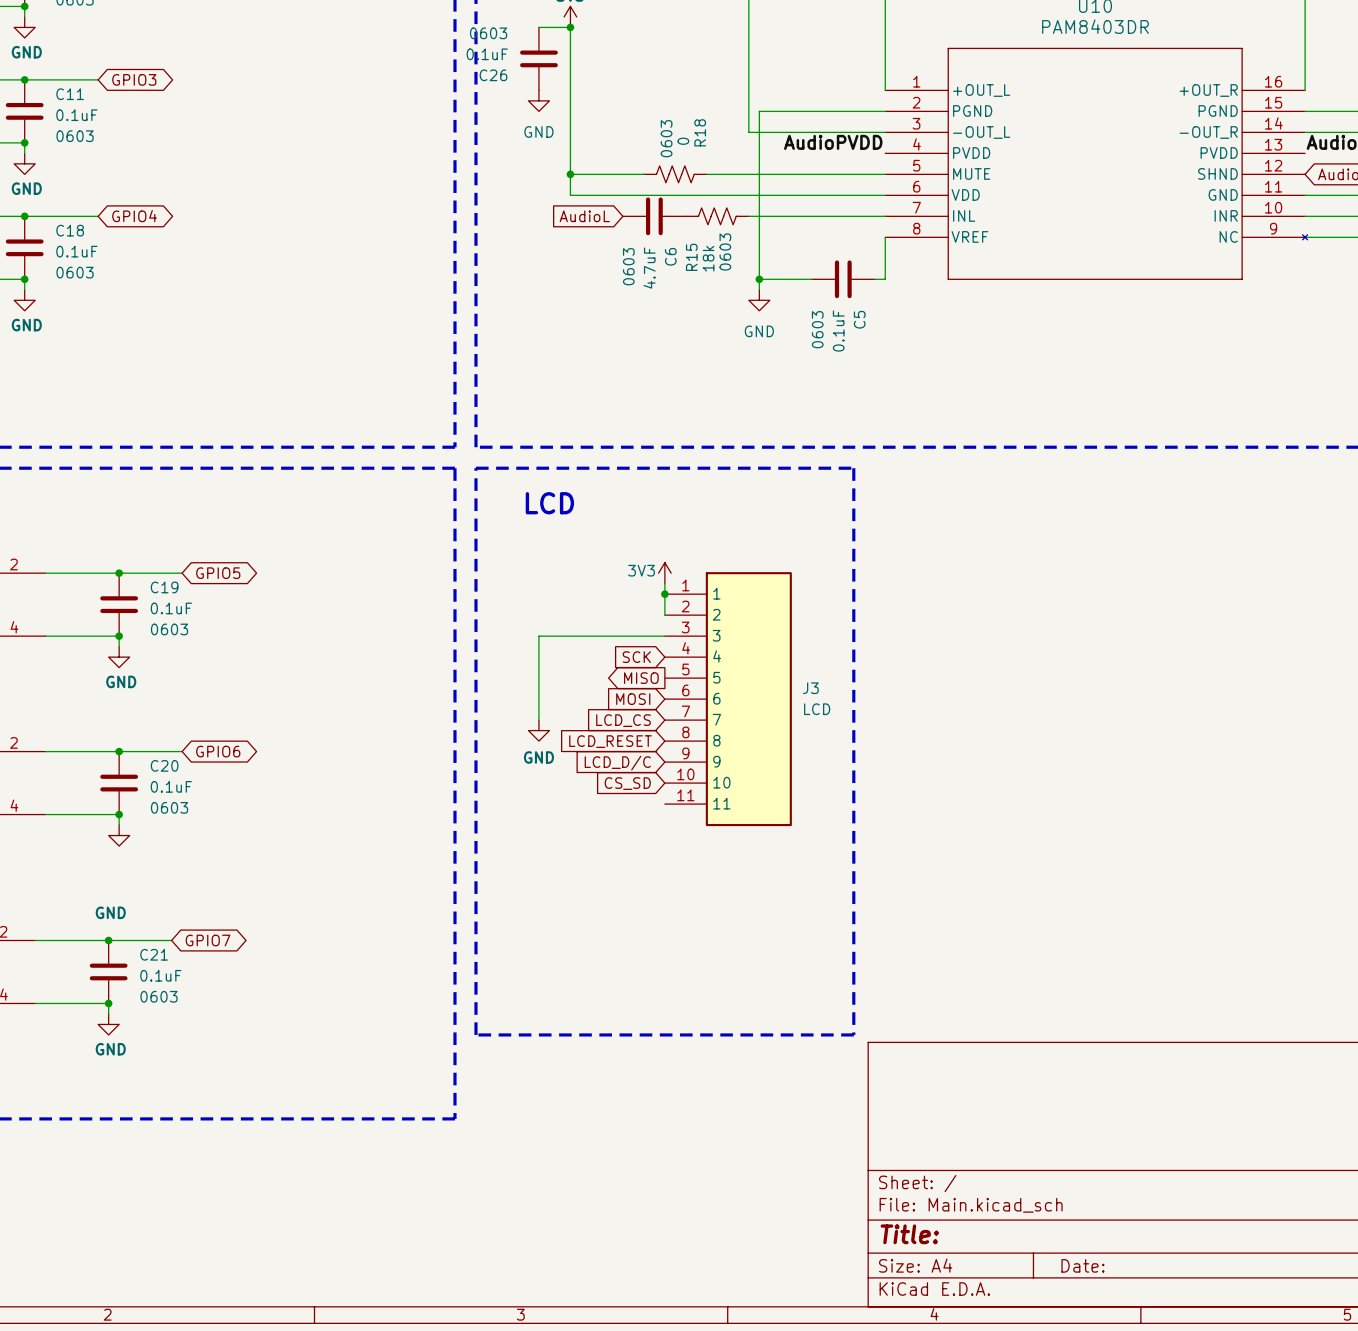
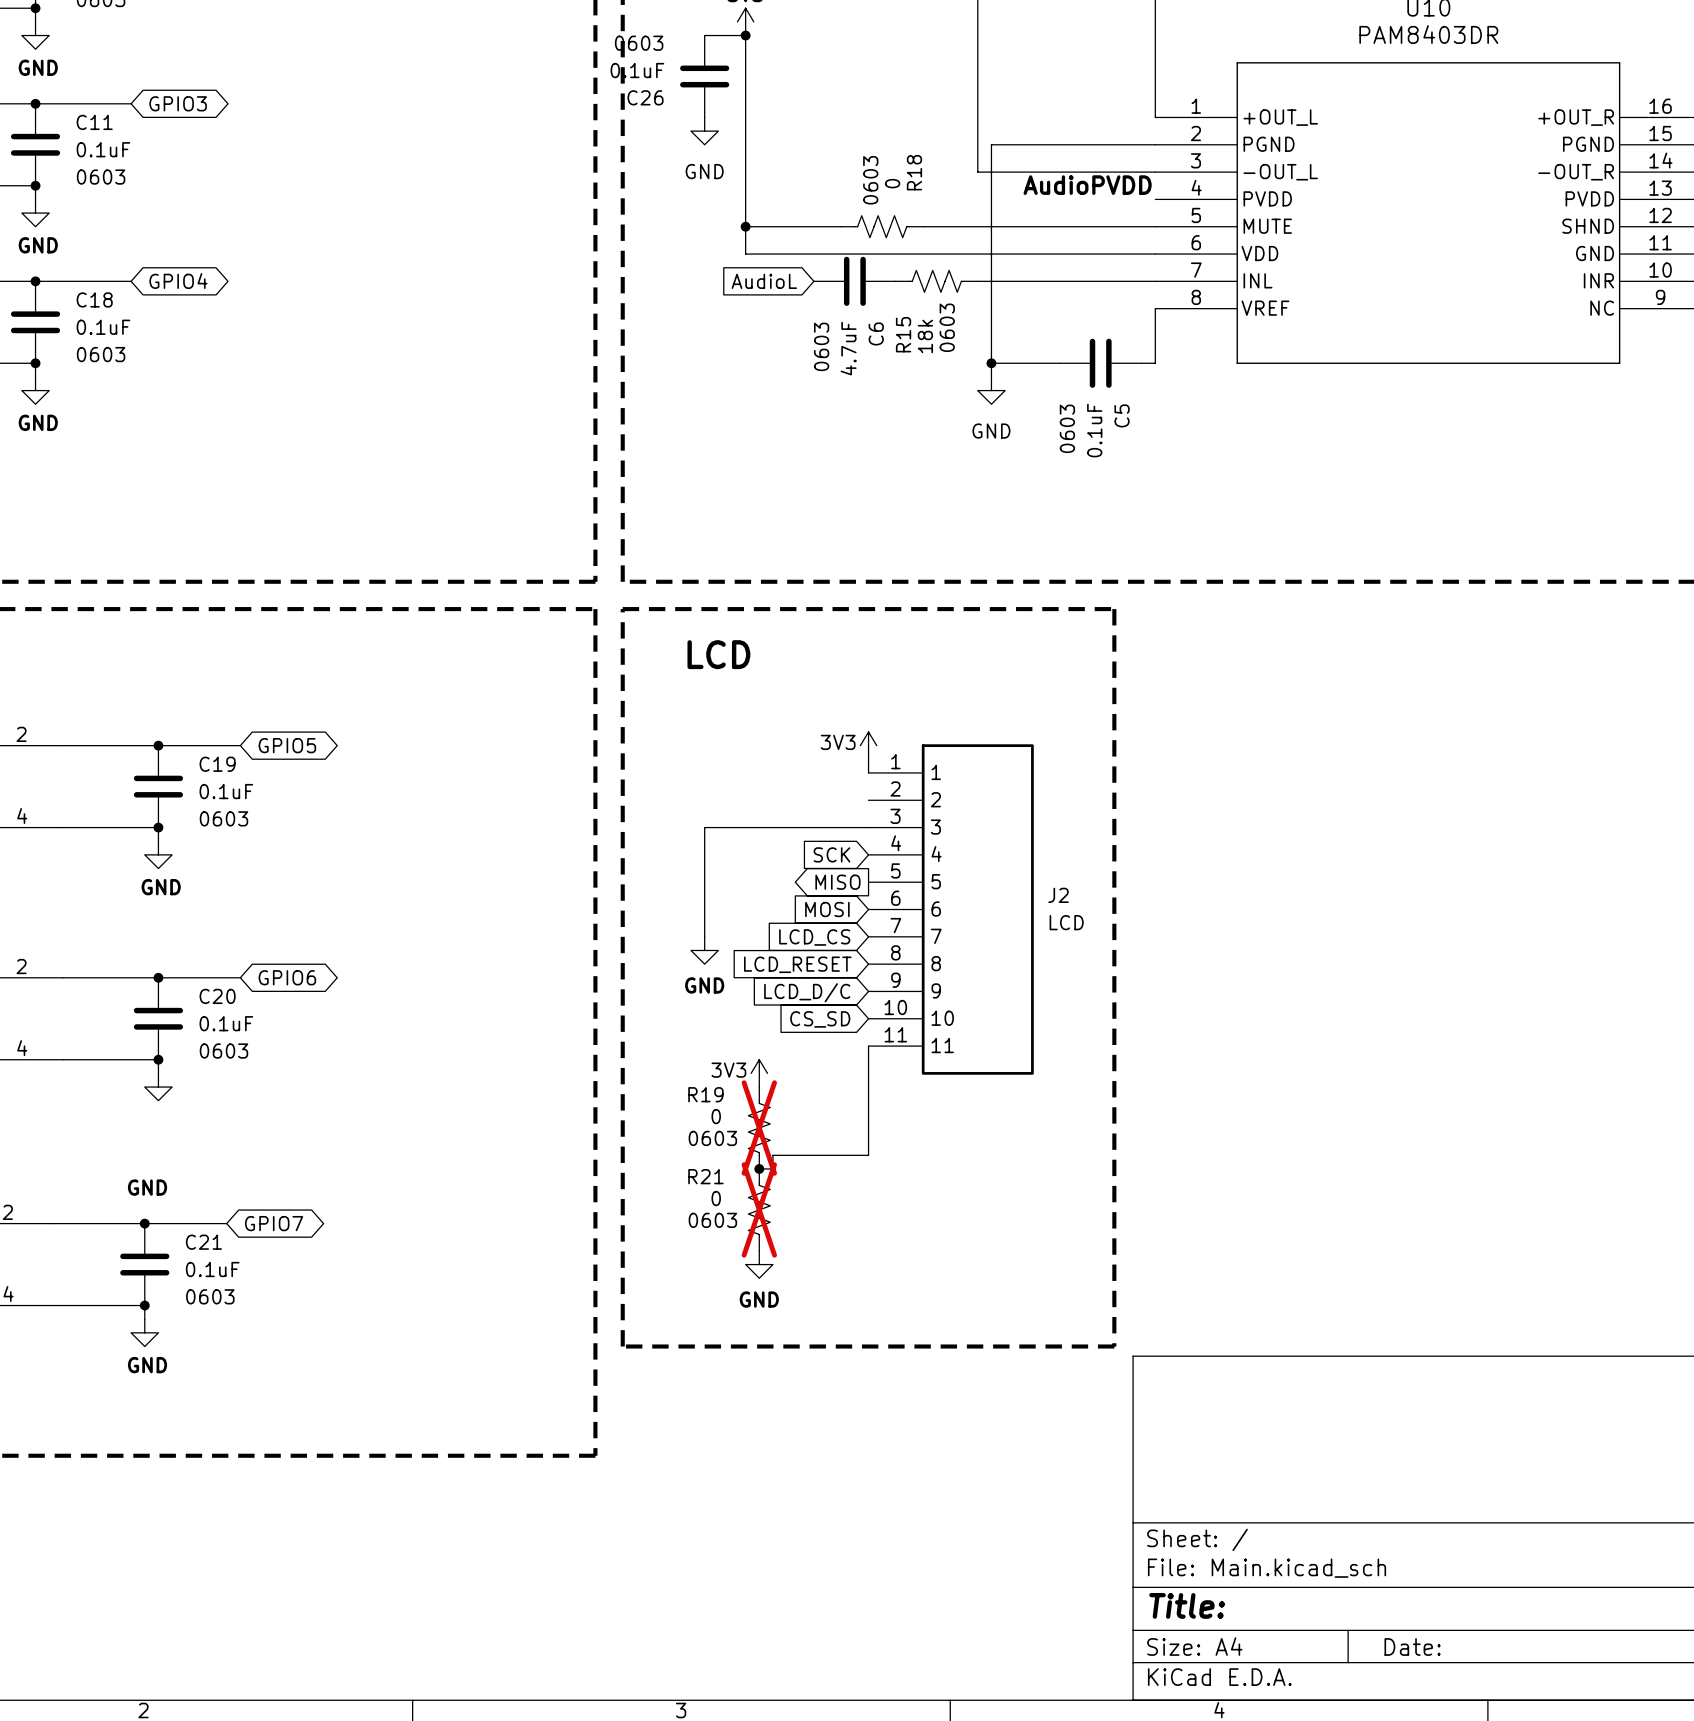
wire: (664, 594) (664, 615) -> none
junction: (664, 594) -> none
J3 name: J3 (810, 688) -> J2 (1058, 895)
wire: none -> (868, 1046) (868, 1155) (772, 1155) (772, 1168) (759, 1168)
power symbol: none -> 3V3 (759, 1073)
R19: none -> 0 (759, 1128)
junction: none -> (759, 1168)
R21: none -> 0 (759, 1209)
power symbol: none -> GND (759, 1264)

